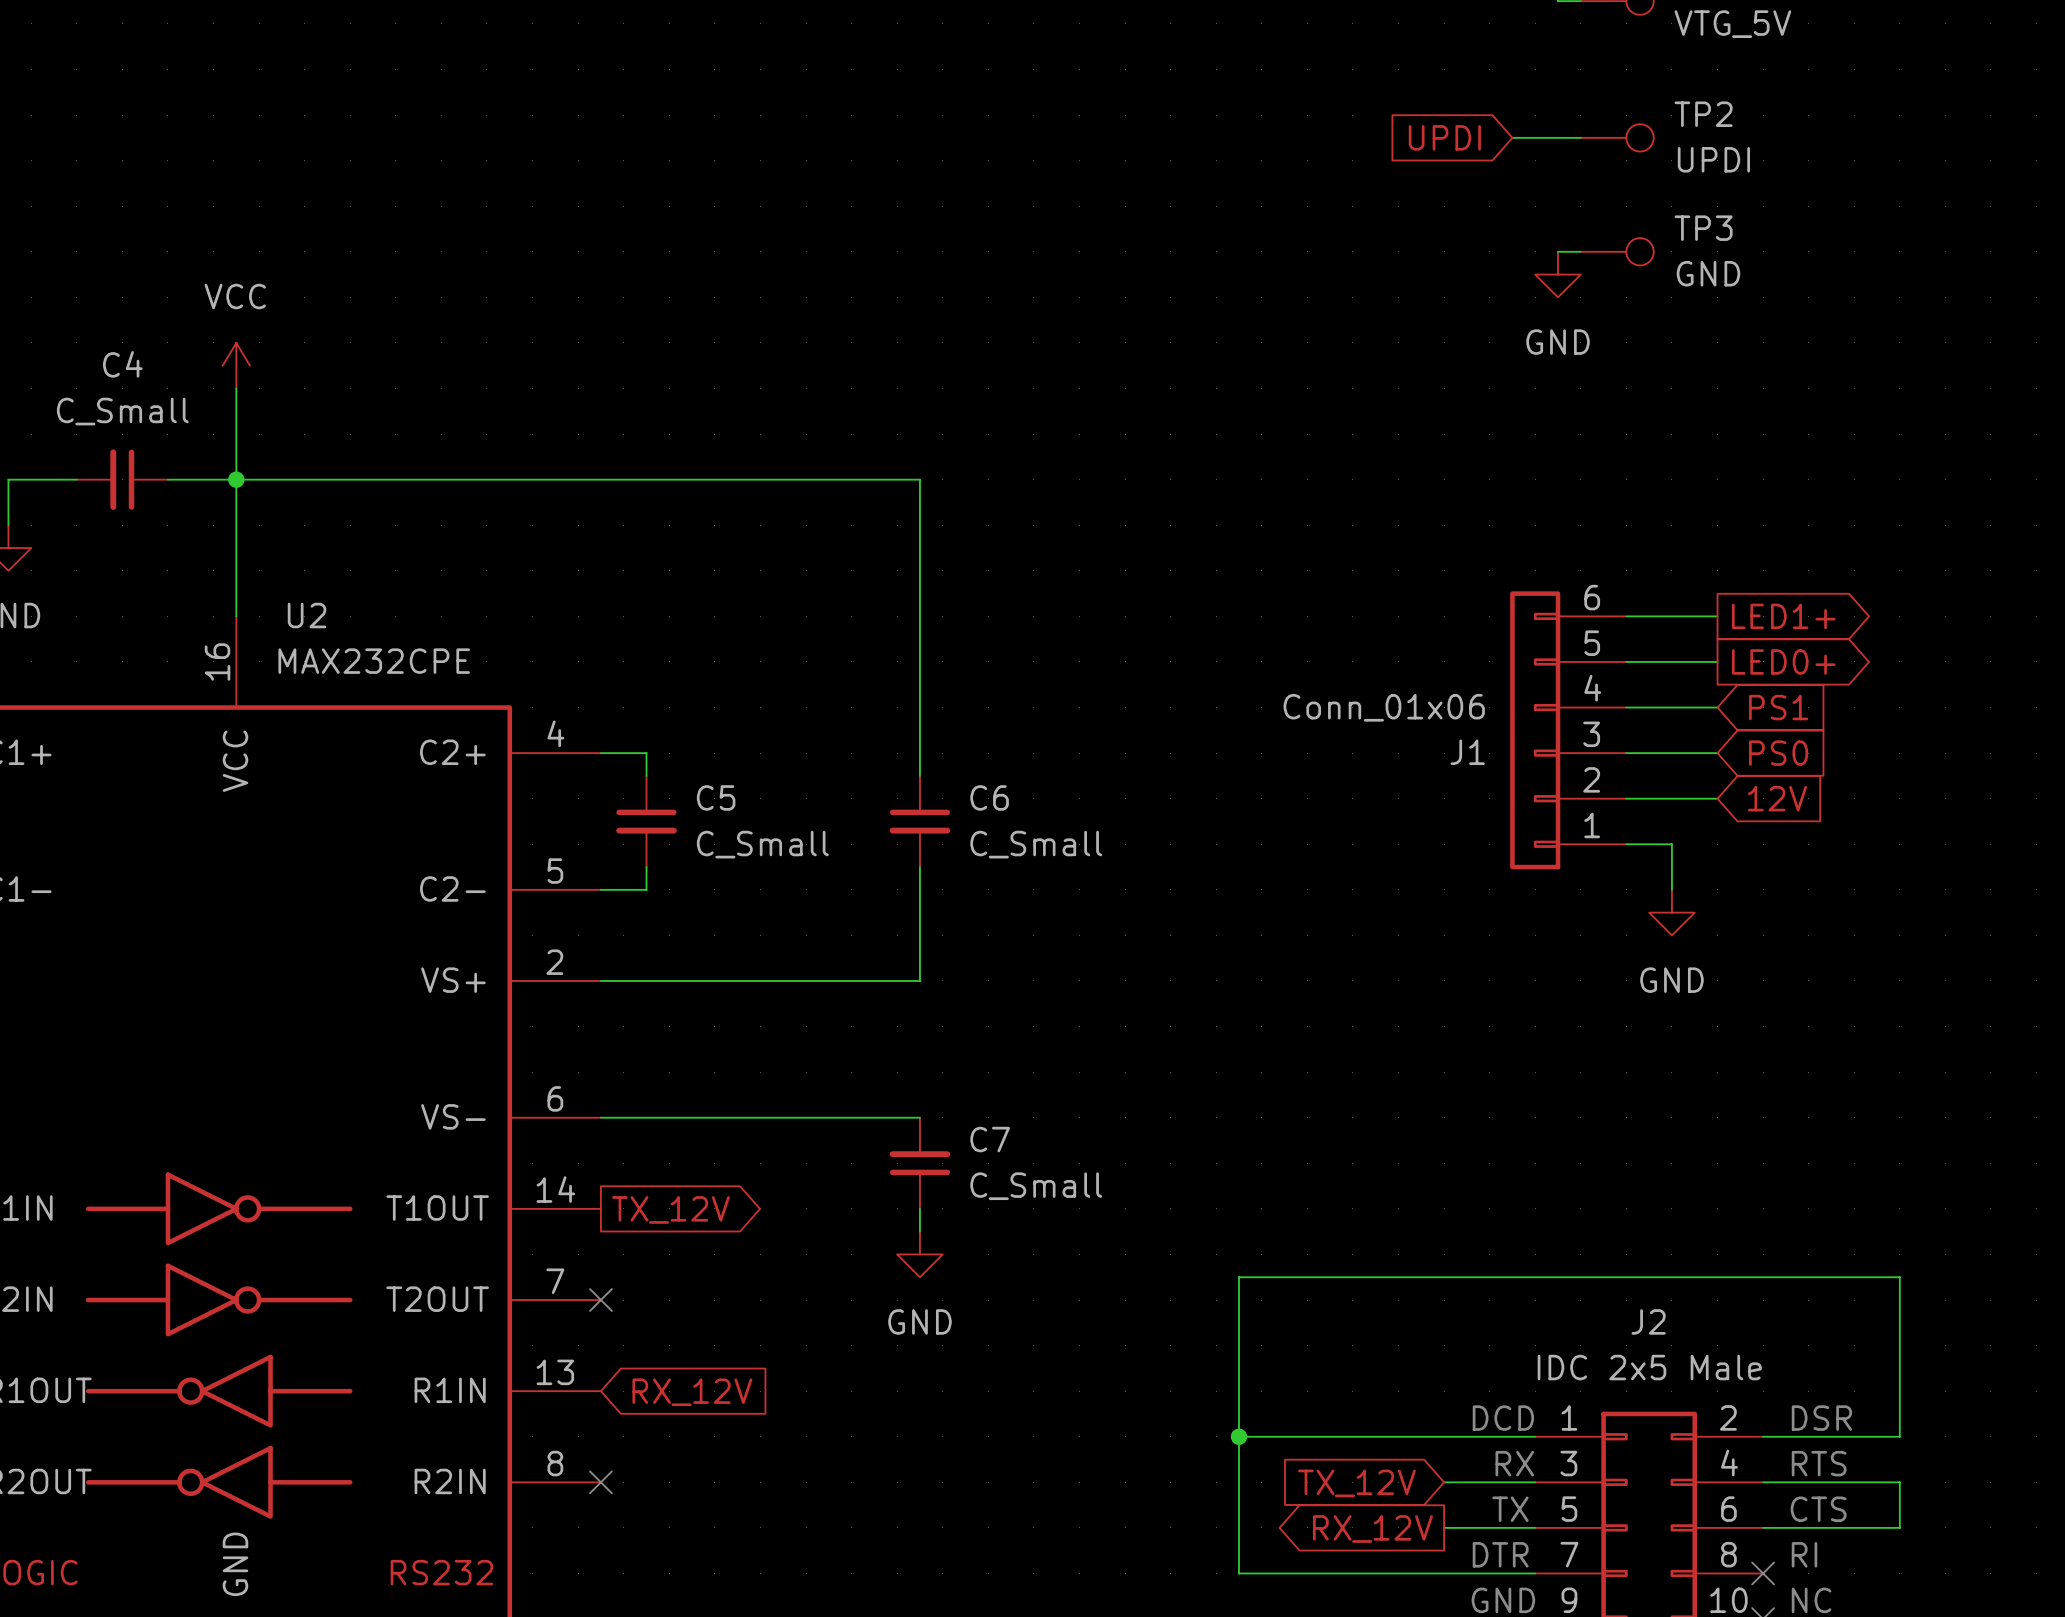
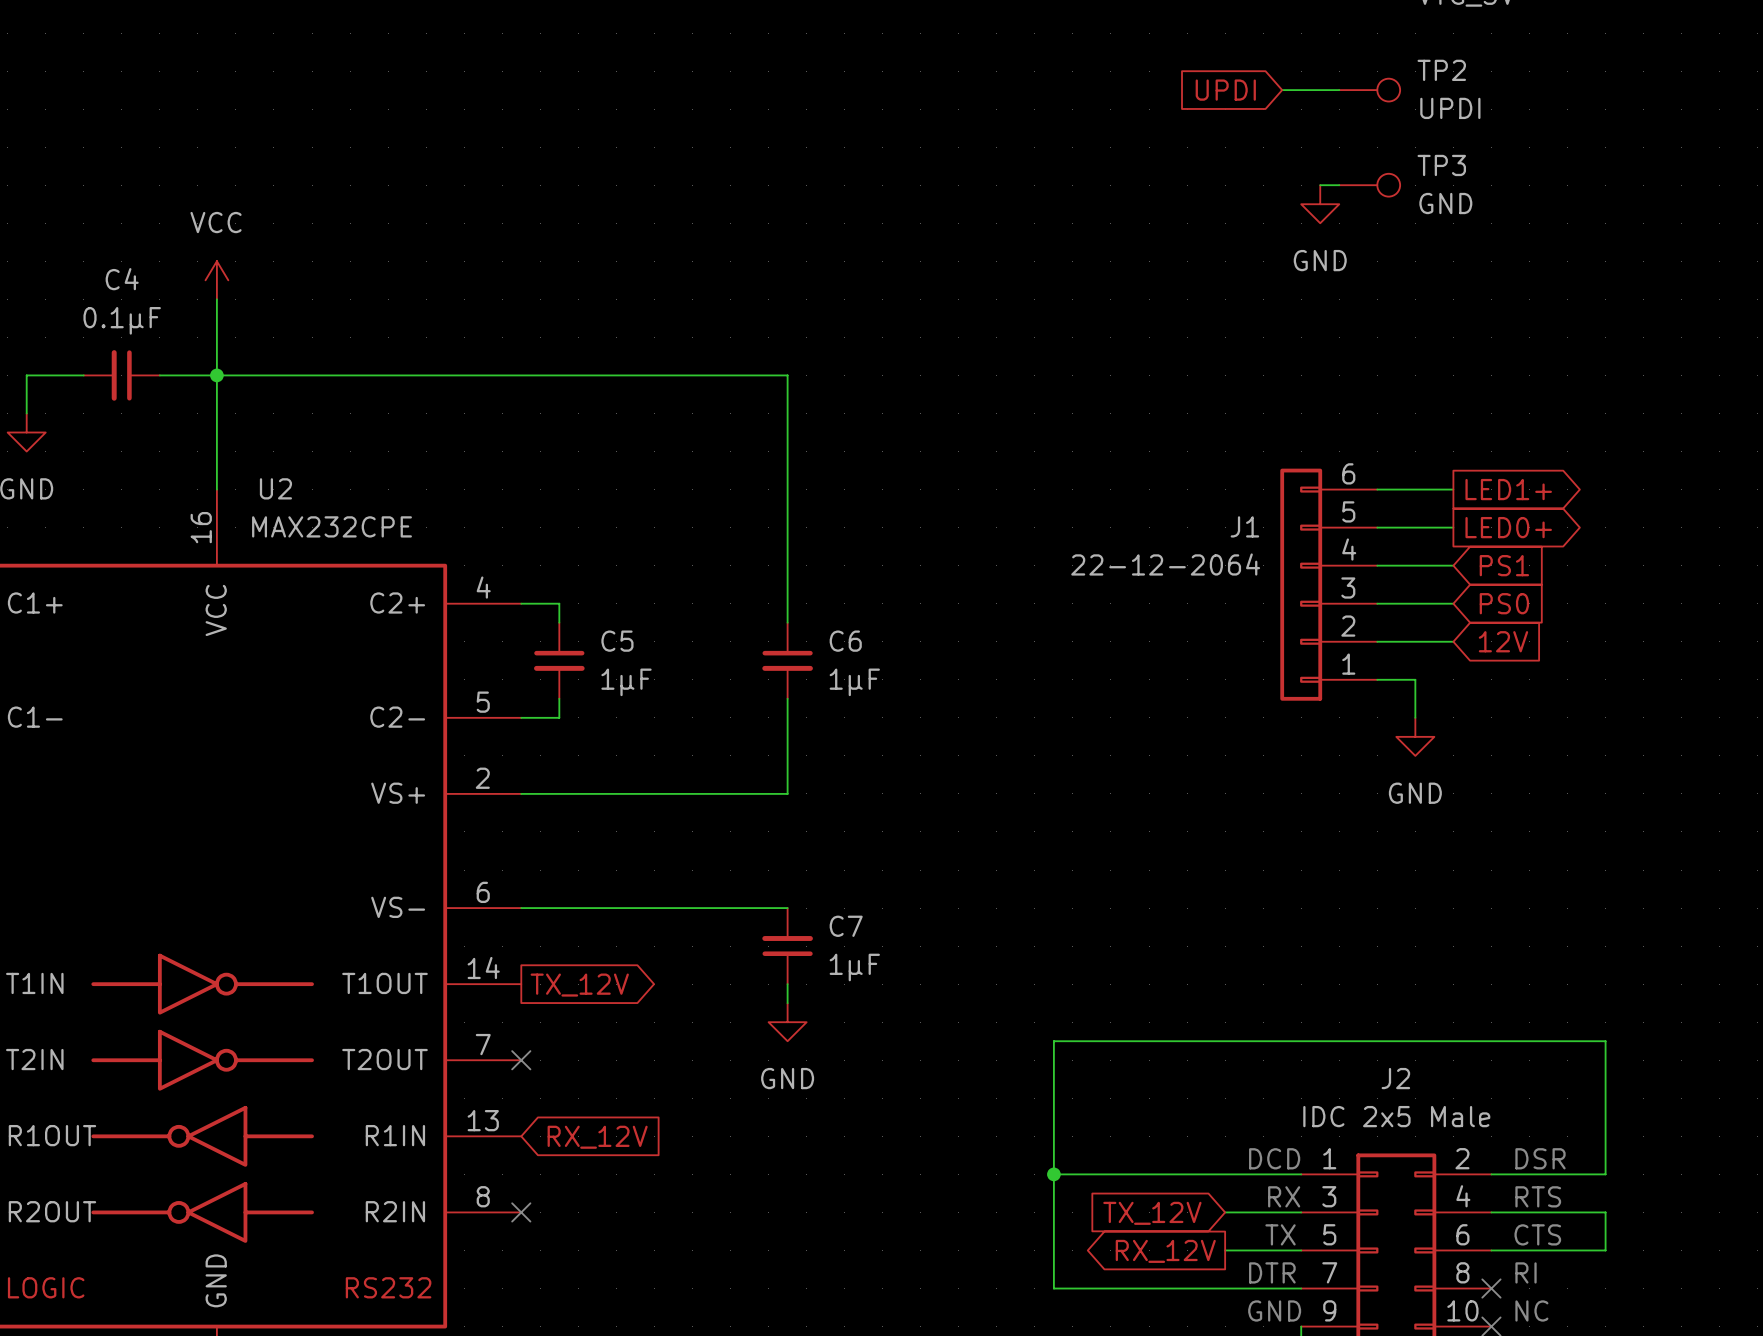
C4 value: C_Small (122, 411) -> 0.1μF (122, 320)
J1 value: Conn_01x06 (1384, 707) -> 22-12-2064 (1165, 564)
J1 name position: J1 (1467, 752) -> J1 (1244, 526)
C5 value: C_Small (762, 844) -> 1μF (626, 682)
C6 value: C_Small (1036, 844) -> 1μF (854, 682)
C7 value: C_Small (1036, 1186) -> 1μF (854, 967)

